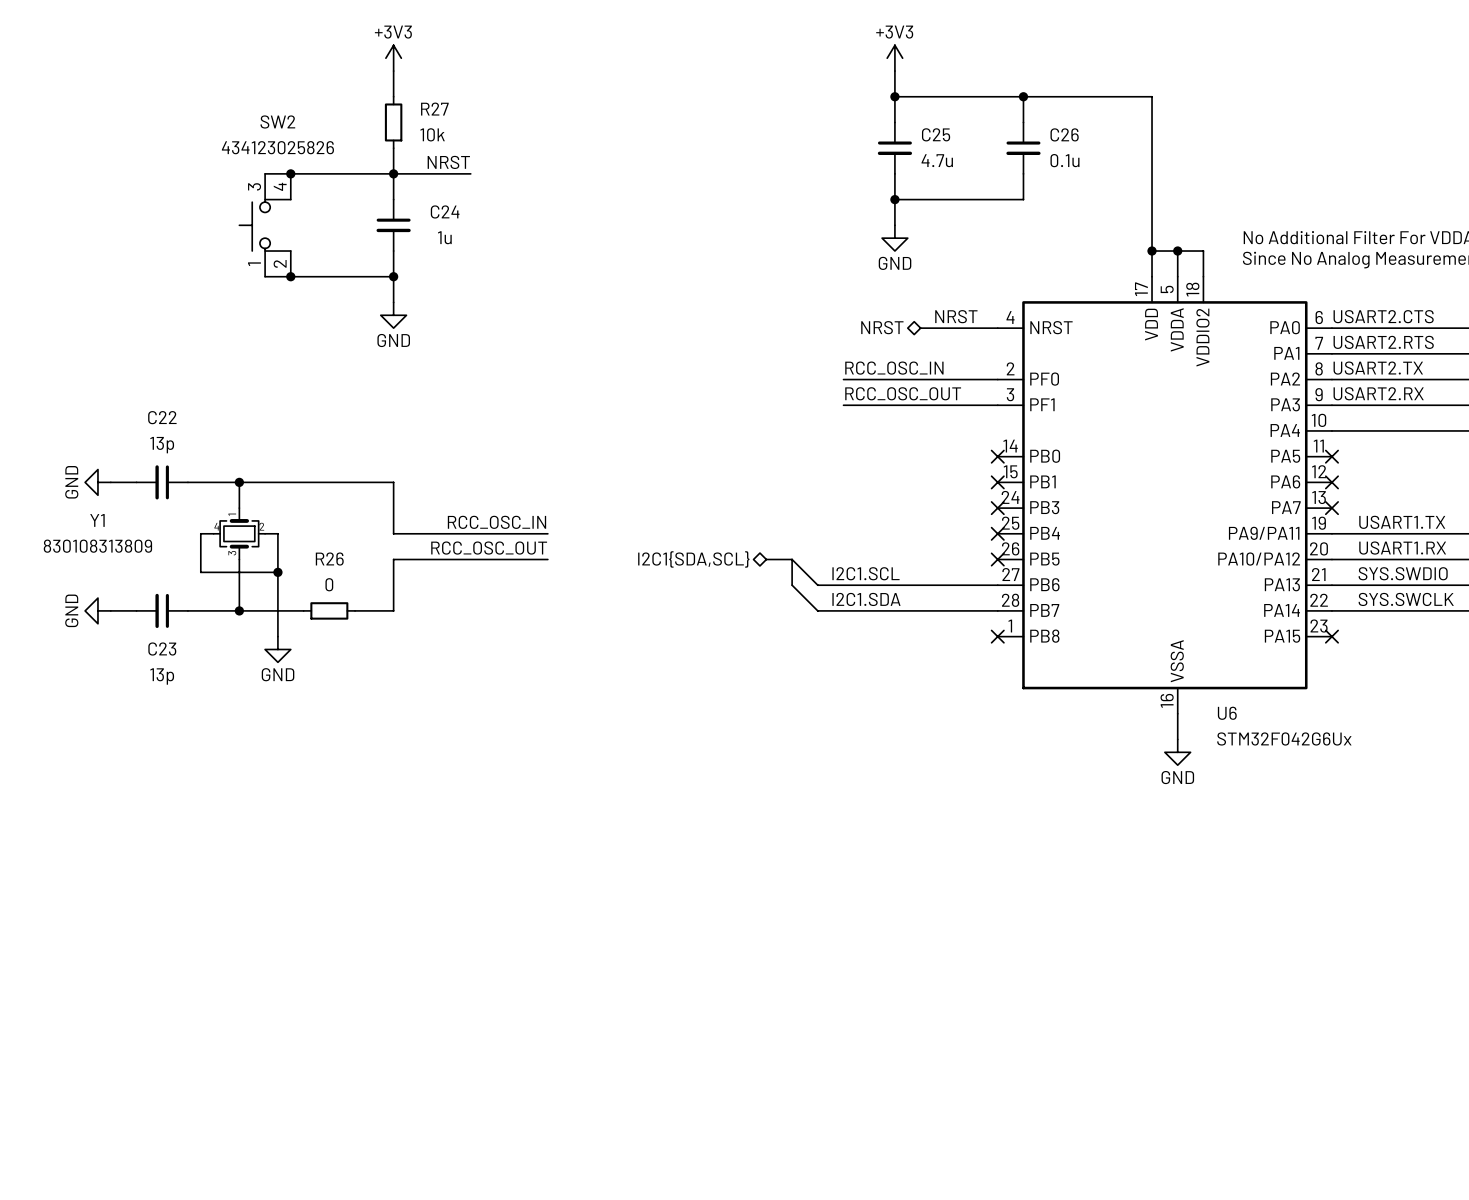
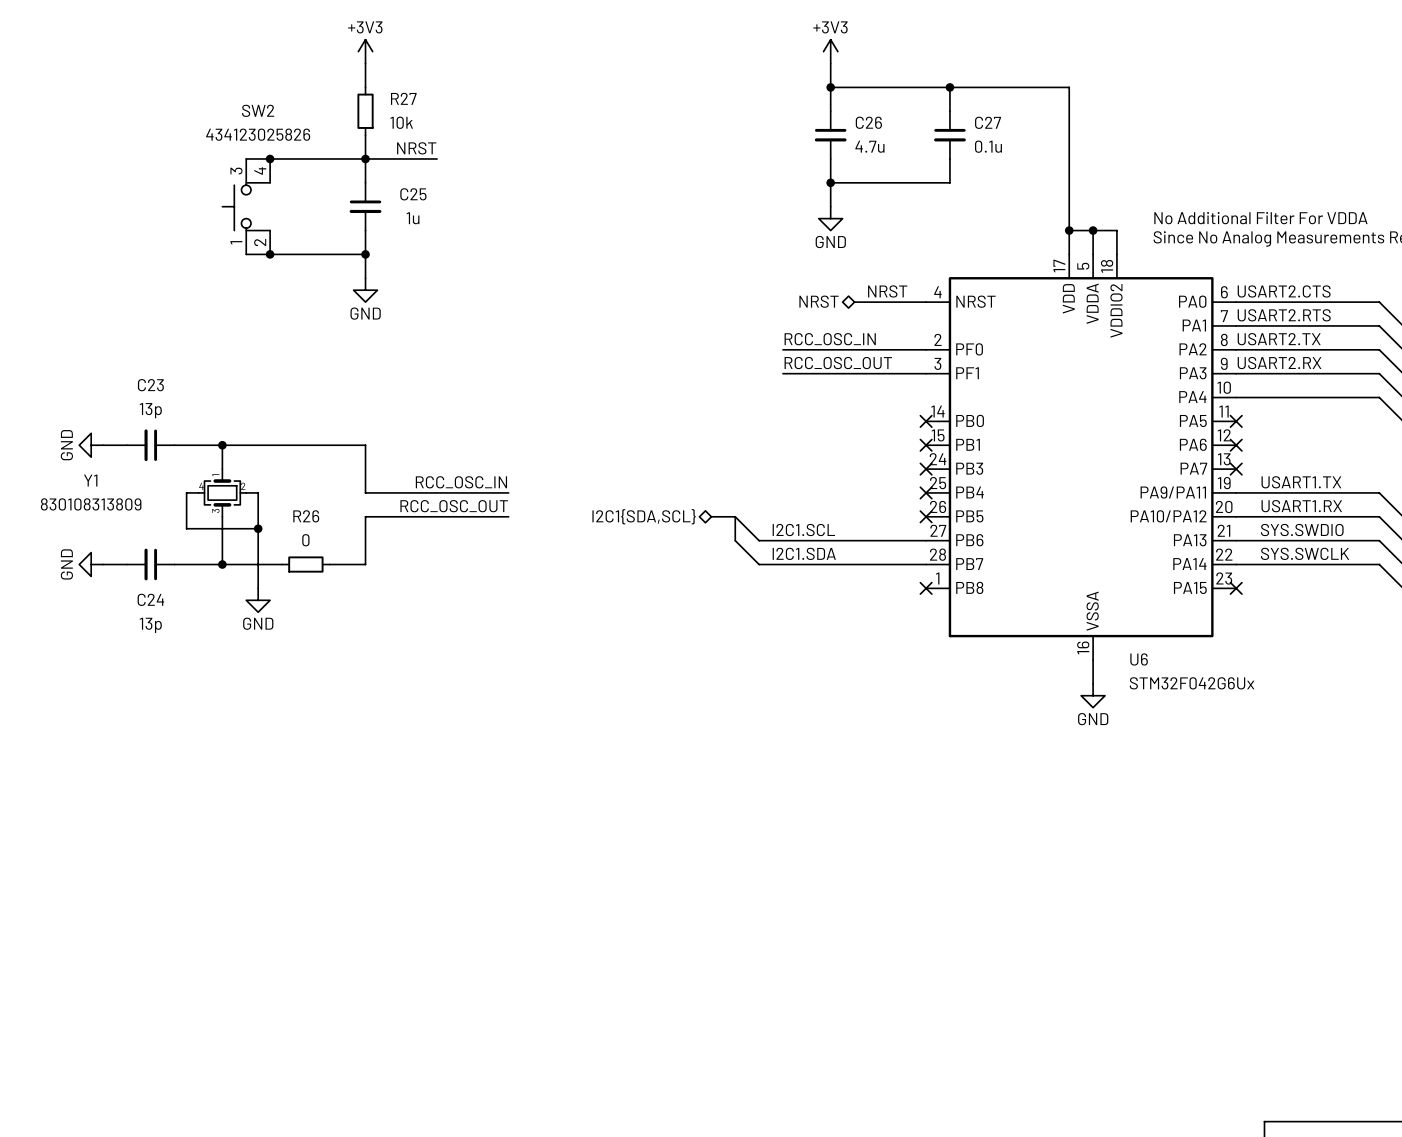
C25 name: C25 (936, 134) -> C26 (868, 122)
C26 name: C26 (1064, 134) -> C27 (988, 122)
C24 name: C24 (445, 211) -> C25 (413, 194)
C22 name: C22 (162, 417) -> C23 (150, 385)
C23 name: C23 (162, 649) -> C24 (150, 599)

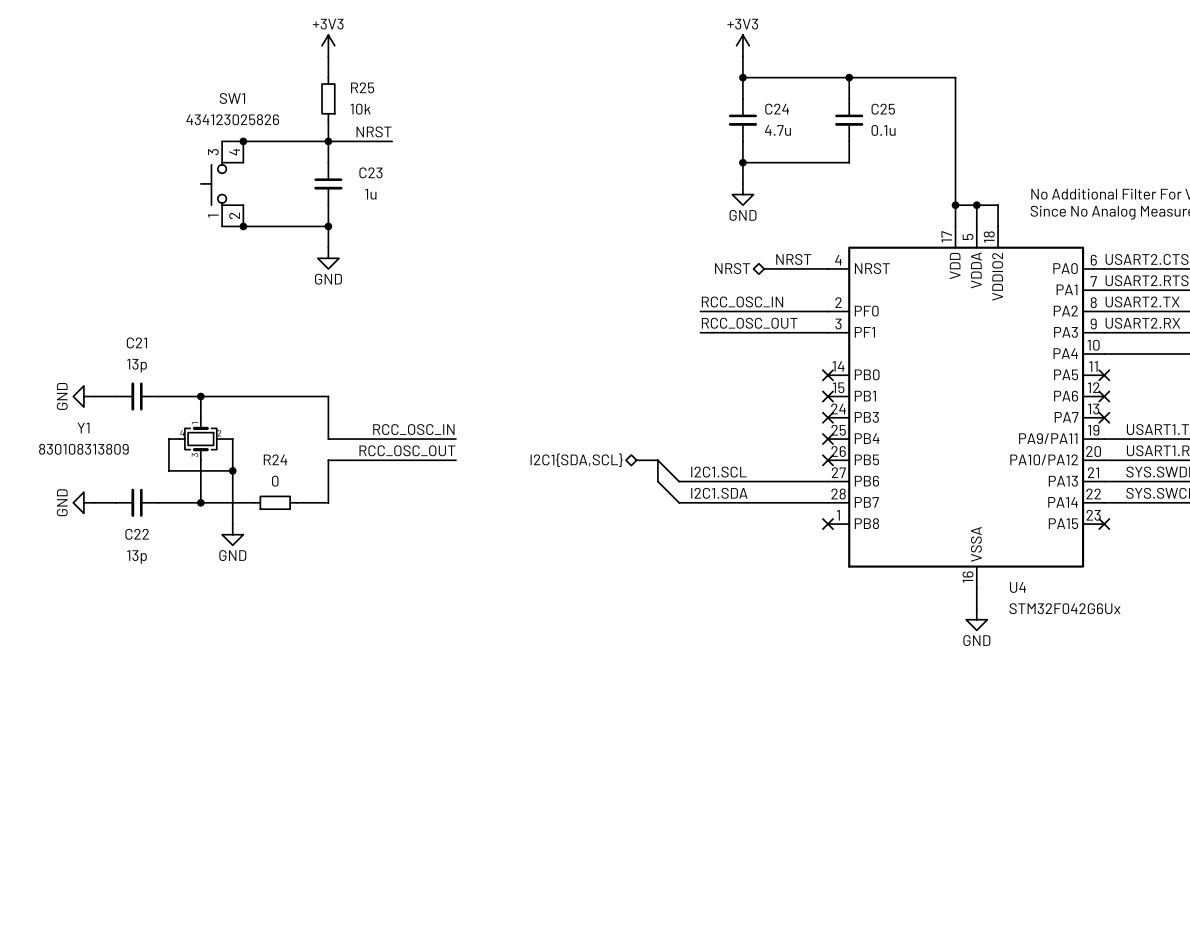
R27 name: R27 (403, 98) -> R25 (362, 87)
SW2 name: SW2 (258, 110) -> SW1 (232, 98)
C26 name: C26 (868, 122) -> C24 (777, 109)
C27 name: C27 (988, 122) -> C25 (883, 109)
C25 name: C25 (413, 194) -> C23 (370, 172)
C23 name: C23 (150, 385) -> C21 (136, 342)
R26 name: R26 (306, 516) -> R24 (275, 459)
C24 name: C24 (150, 599) -> C22 (137, 534)
U6 name: U6 (1139, 659) -> U4 (1017, 587)

